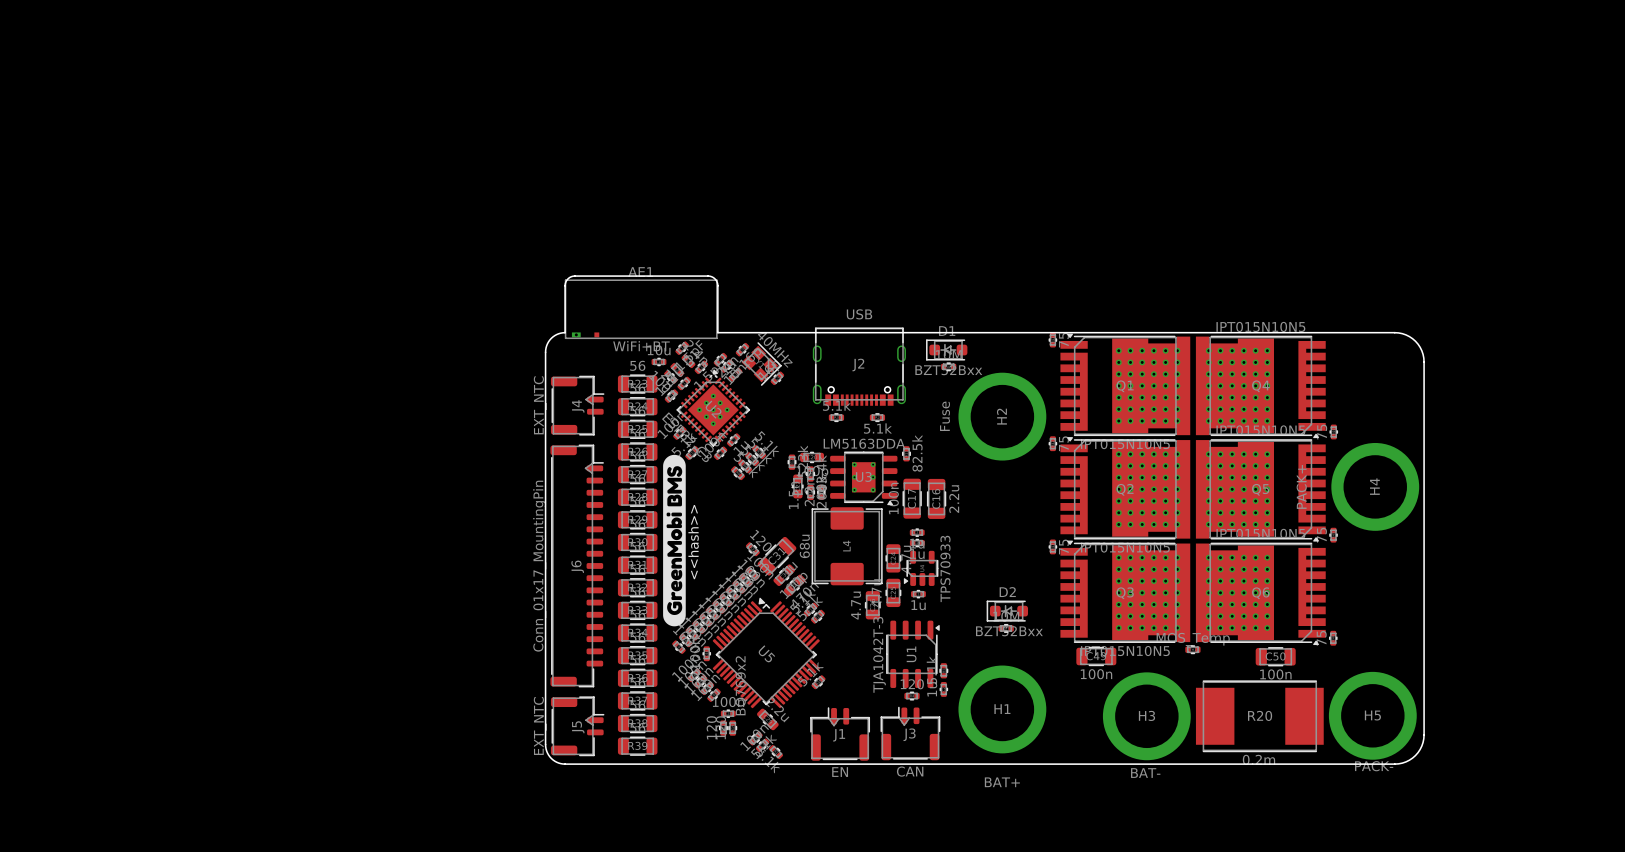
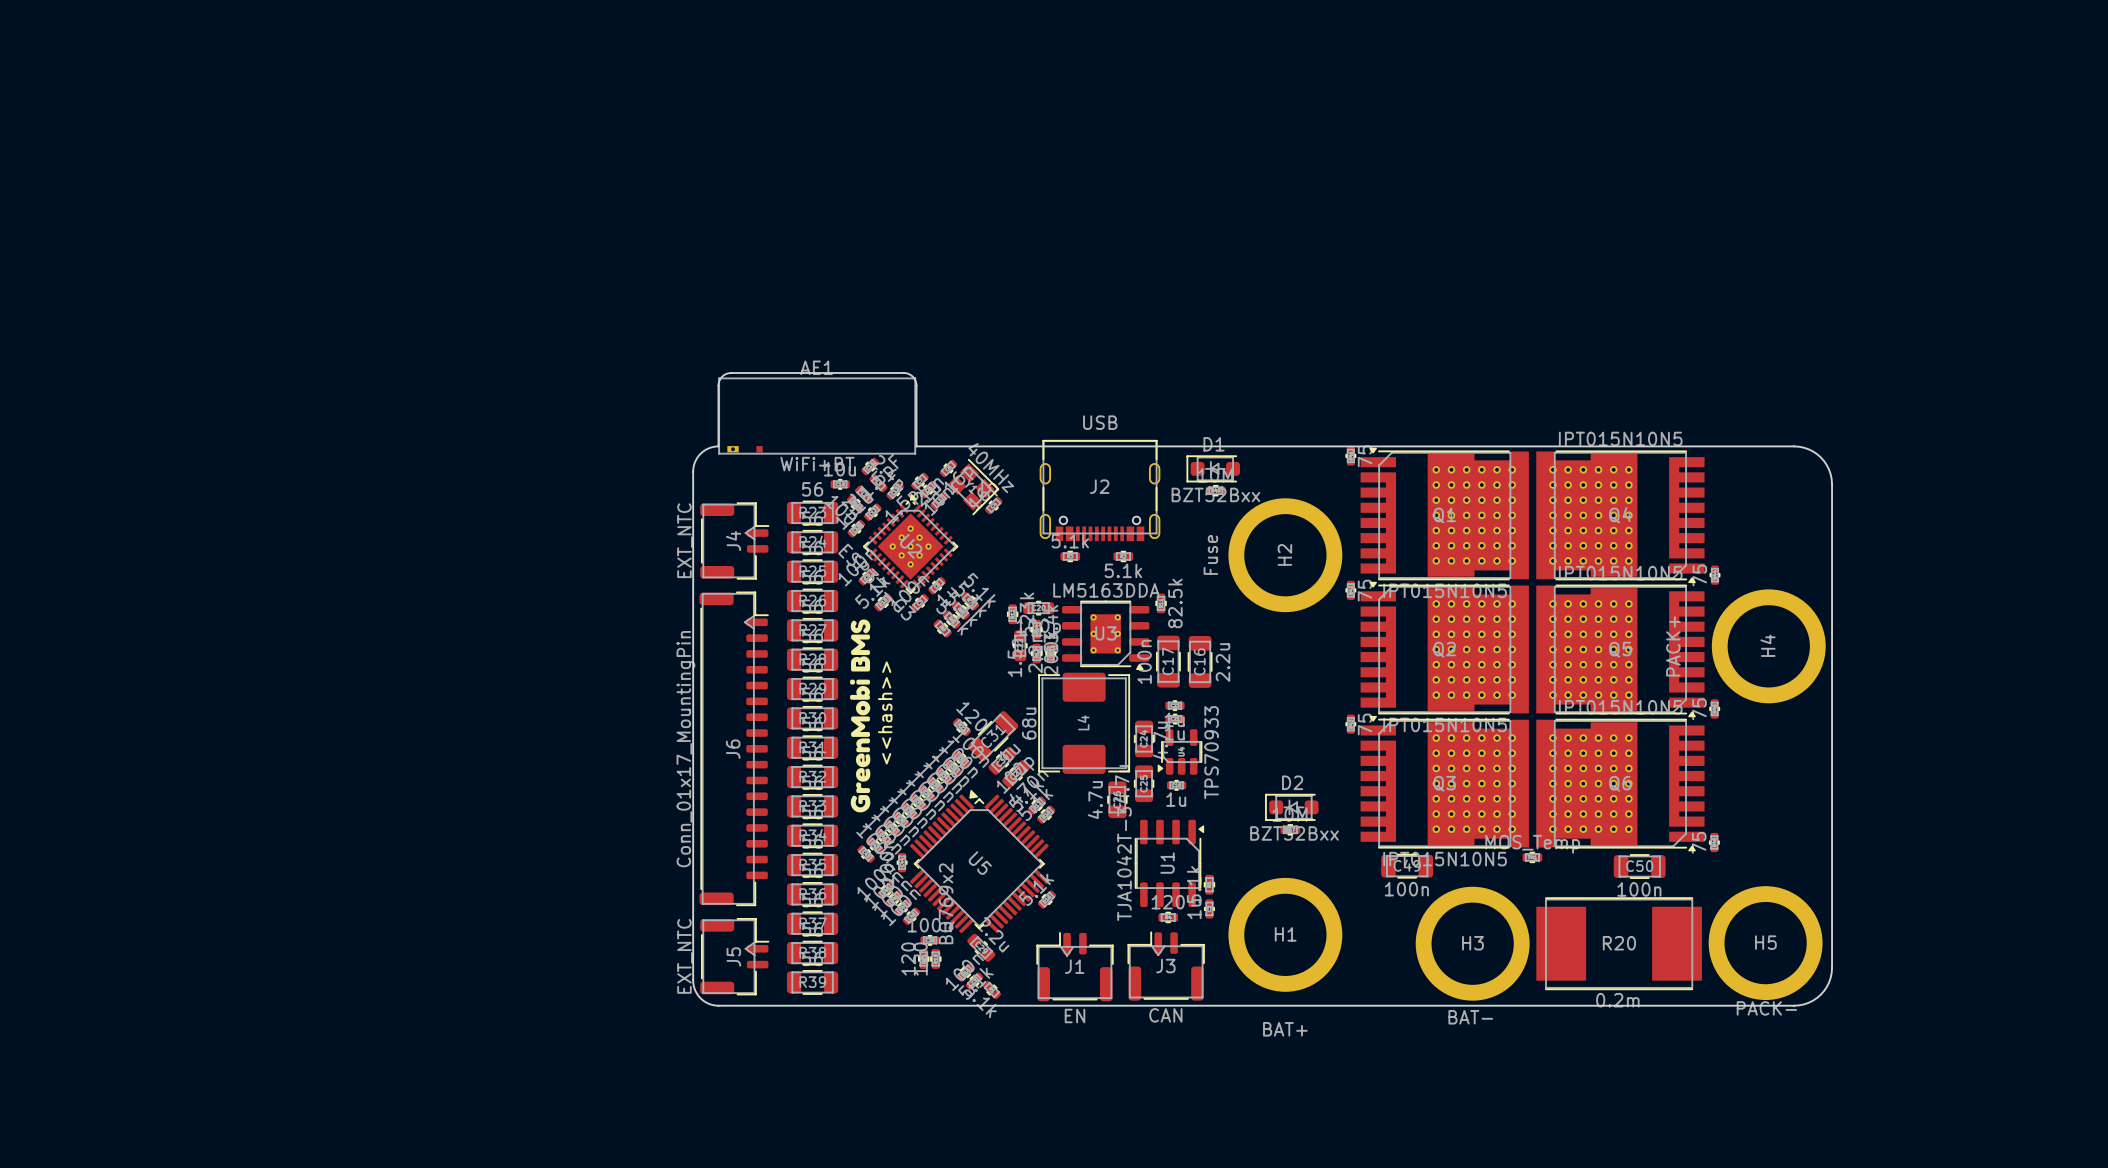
drawing shape: [663, 454, 686, 627] -> [850, 619, 871, 813]

